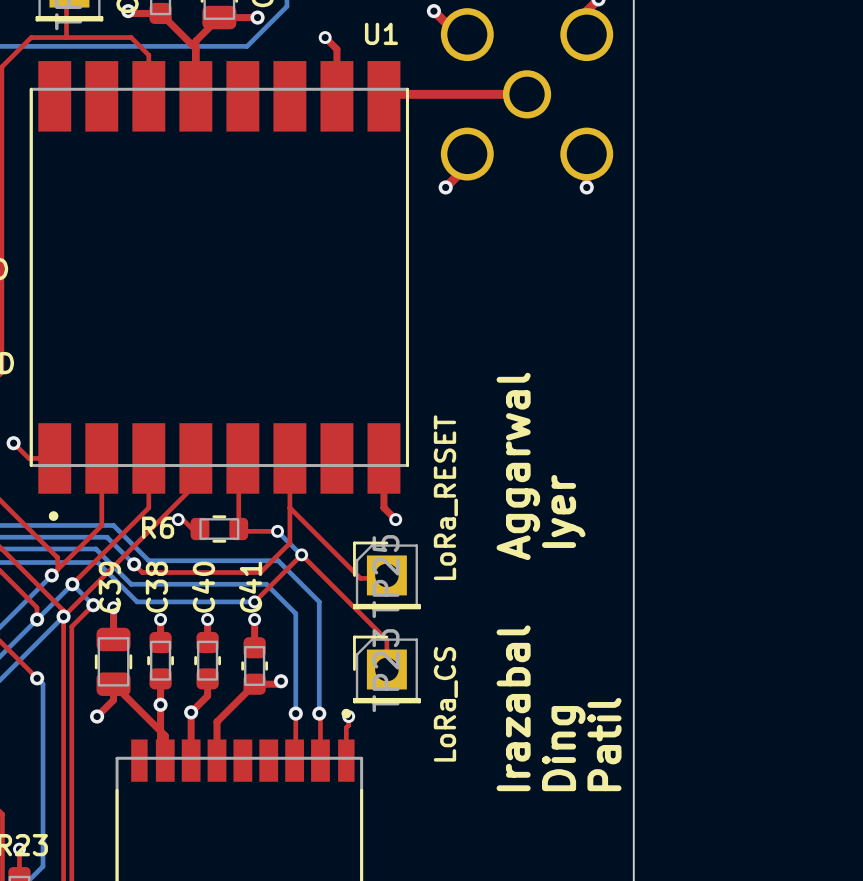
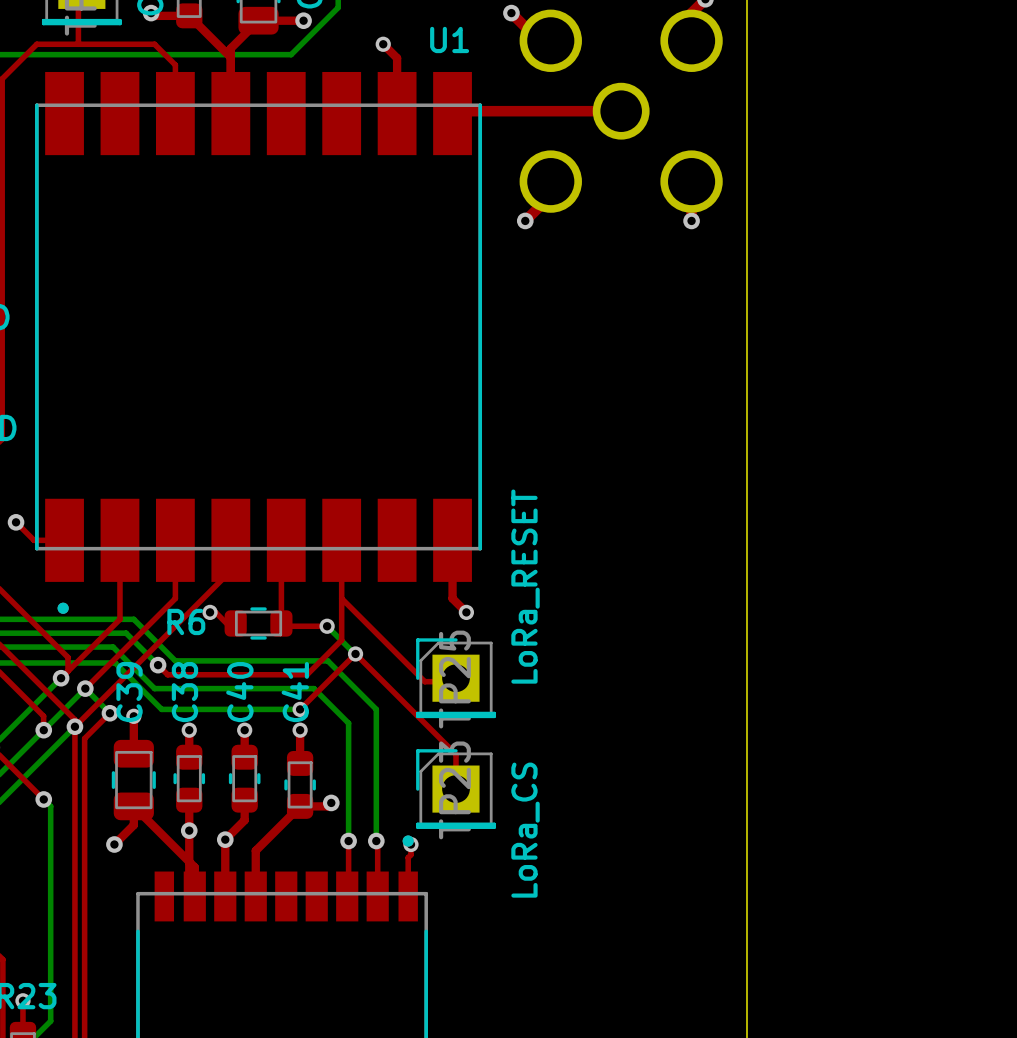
text: Irazabal Aggarwal (518, 581) -> none
text: Ding Iyer (563, 633) -> none
text: Patil (604, 744) -> none

